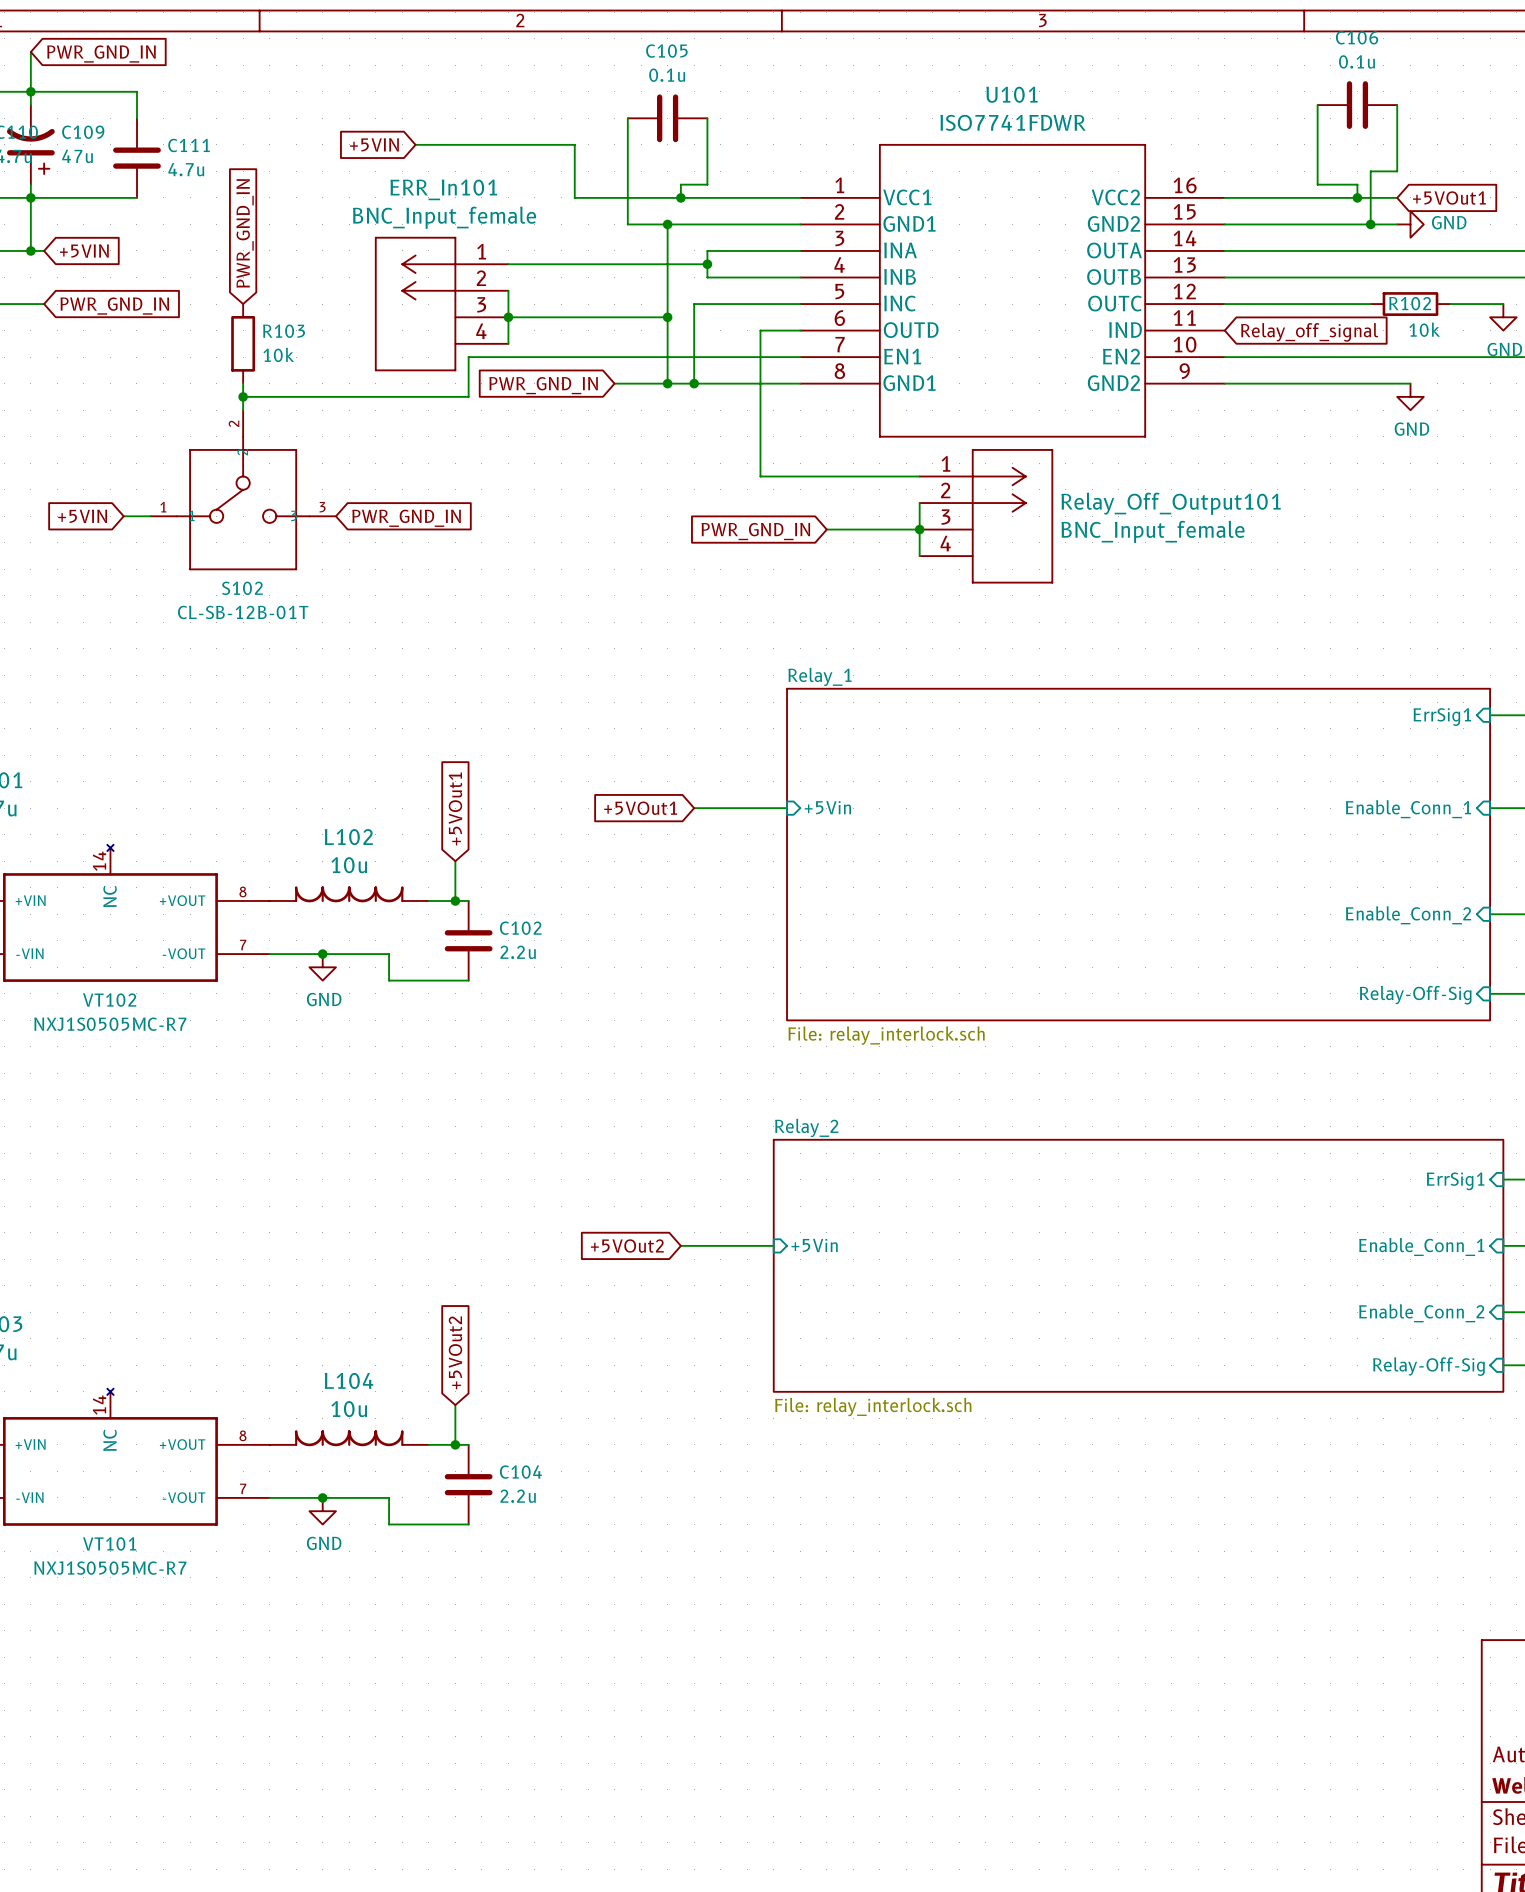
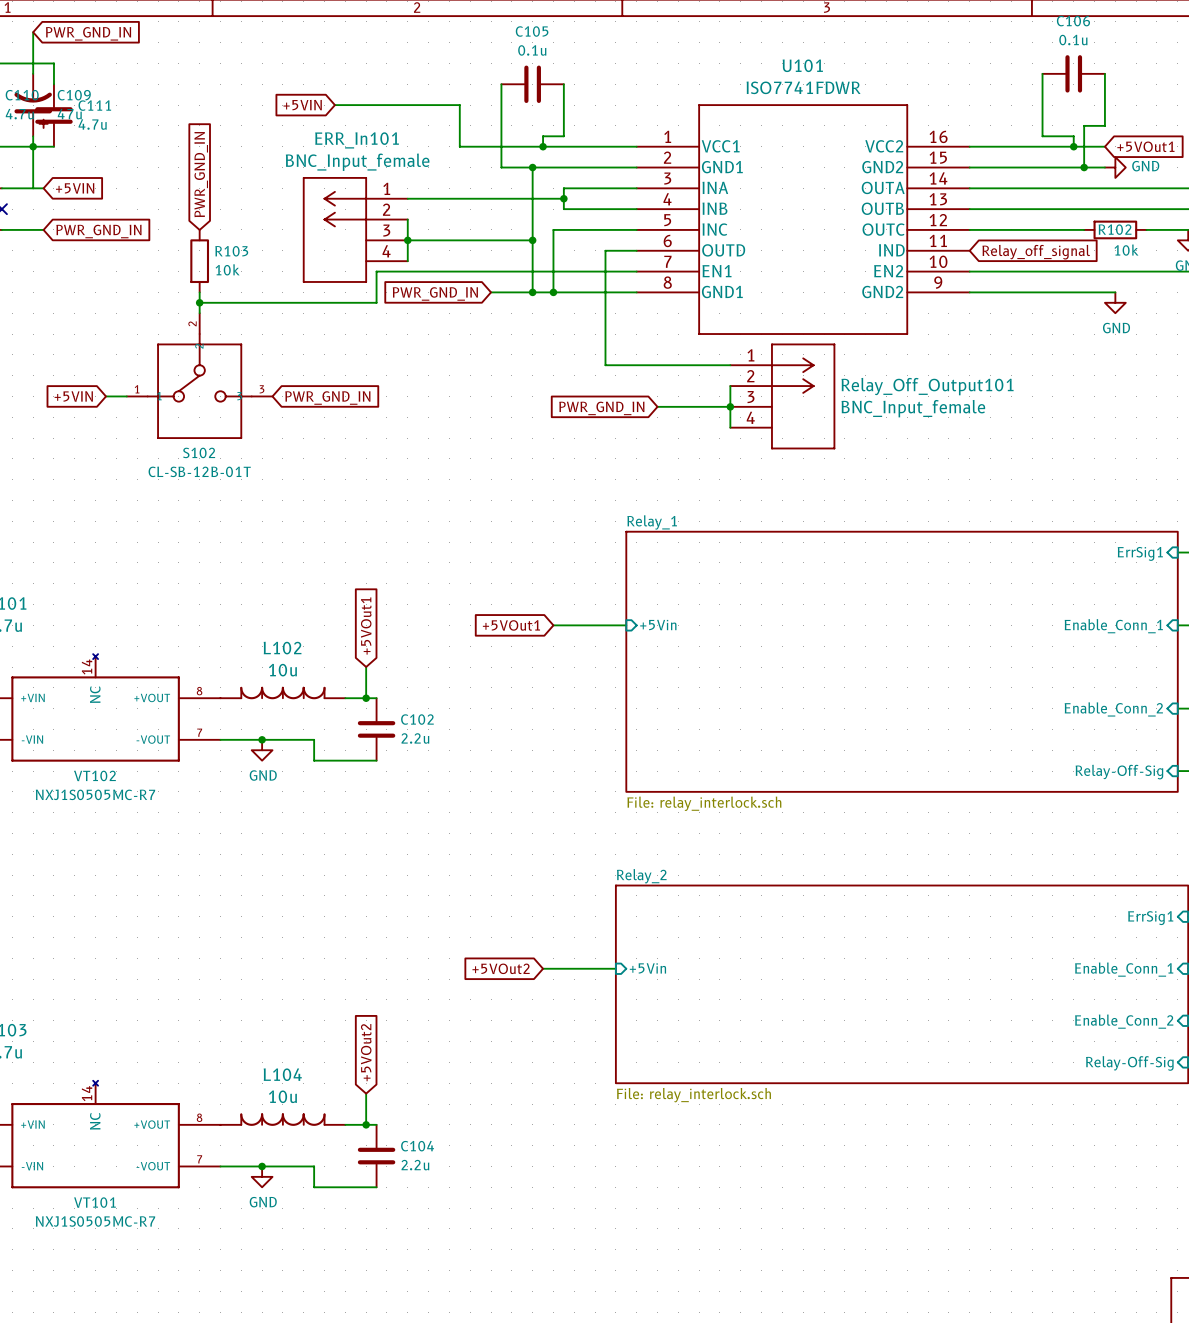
junction: (30, 91) -> none
wire: (57, 91) (136, 91) (136, 118) -> (53, 63) (53, 84)
C111 position: (136, 158) -> (53, 115)
wire: (57, 197) (136, 197) -> none
junction: (30, 250) -> none

